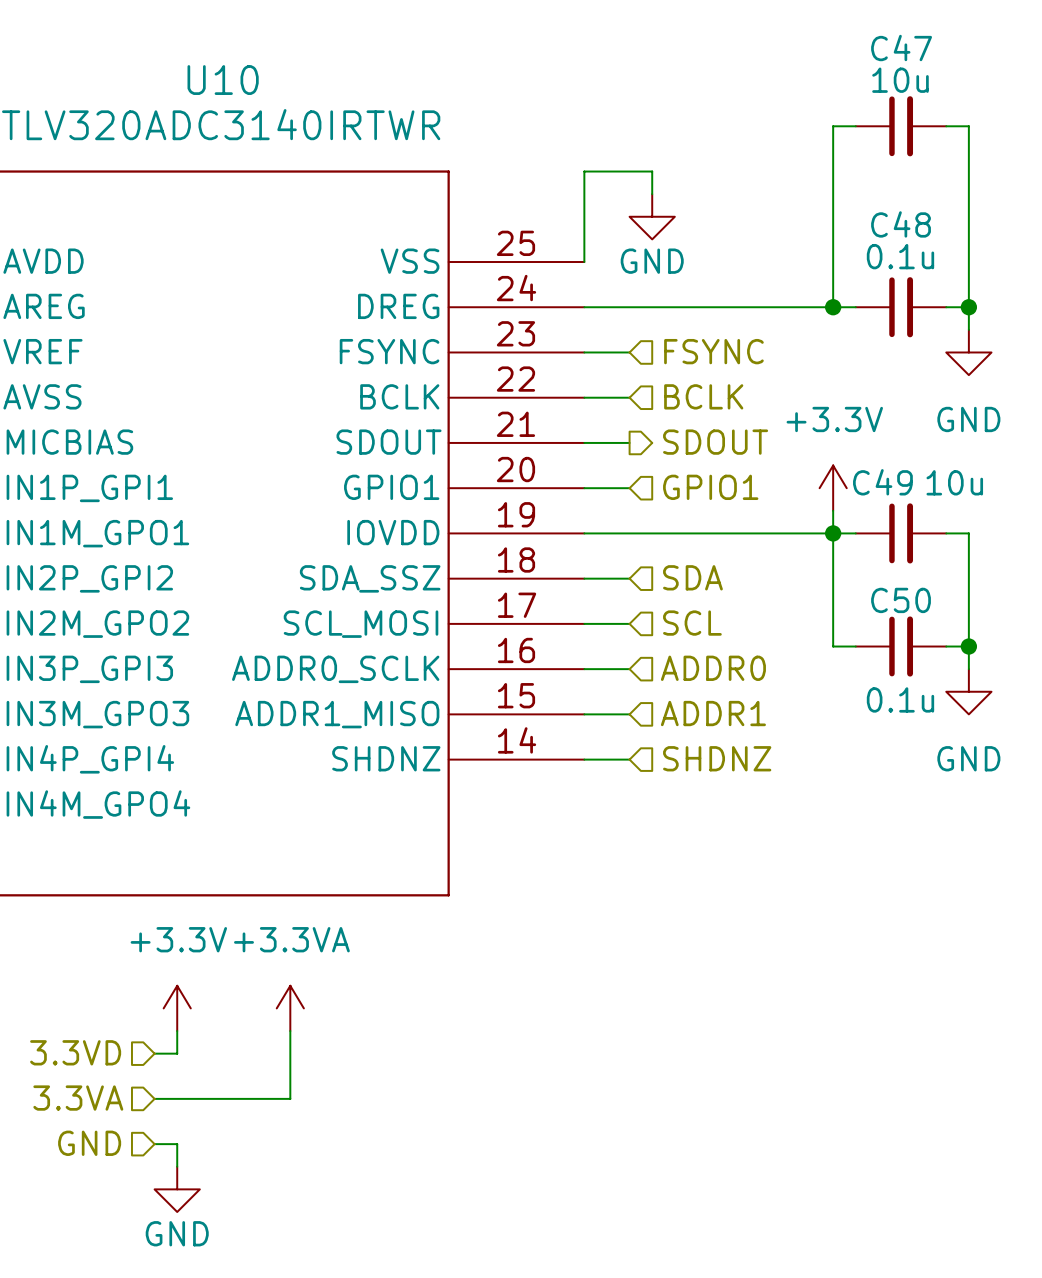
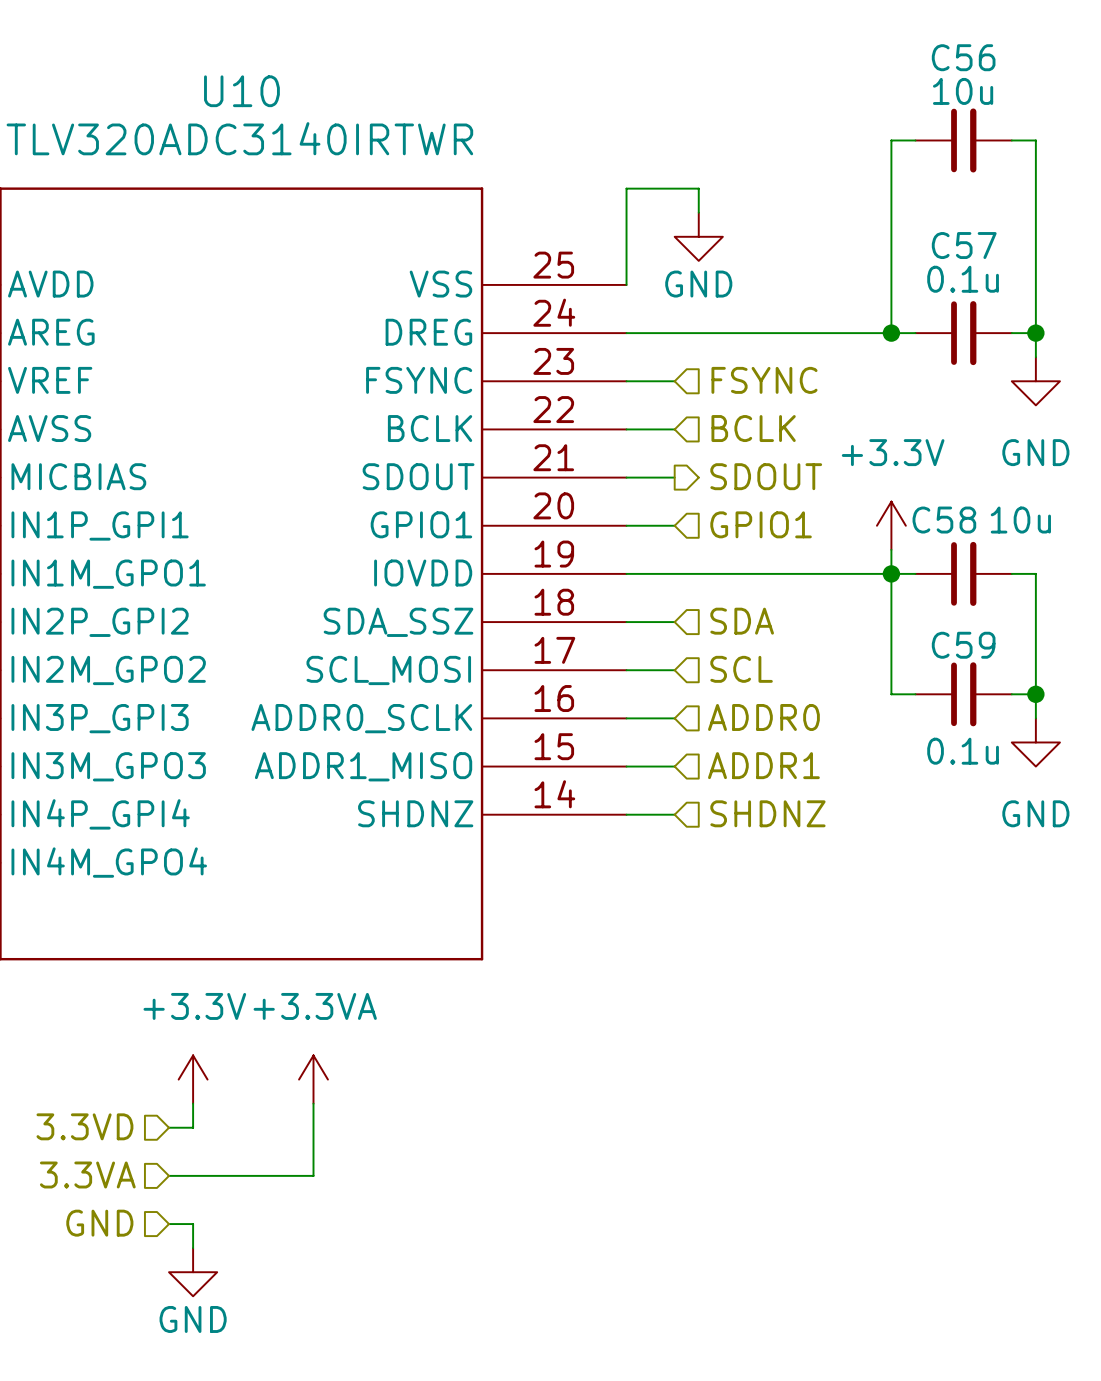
C47 name: C47 (901, 48) -> C56 (963, 57)
C48 name: C48 (901, 224) -> C57 (964, 245)
C49 name: C49 (882, 482) -> C58 (944, 520)
C50 name: C50 (901, 600) -> C59 (963, 645)

